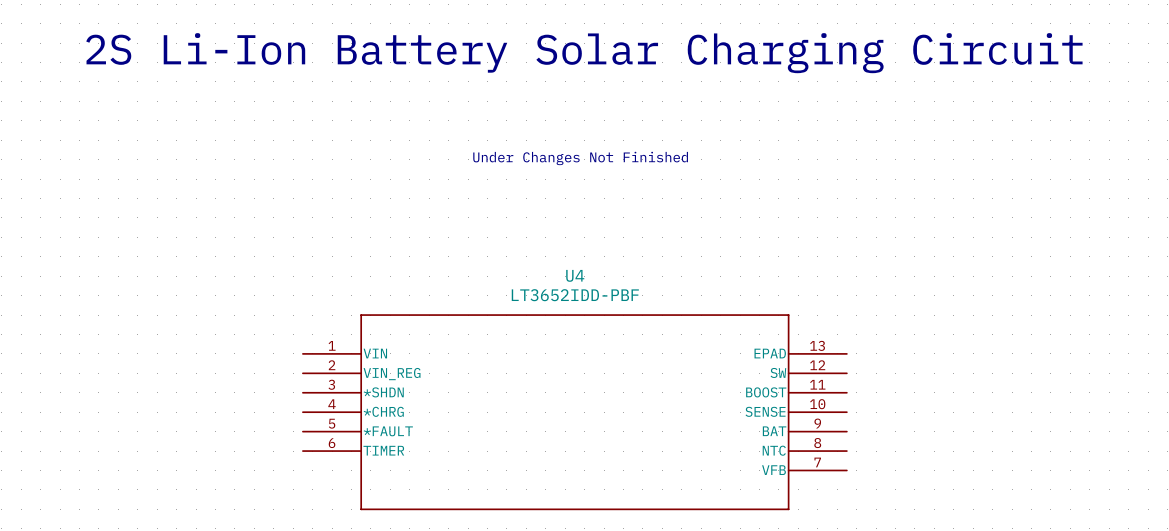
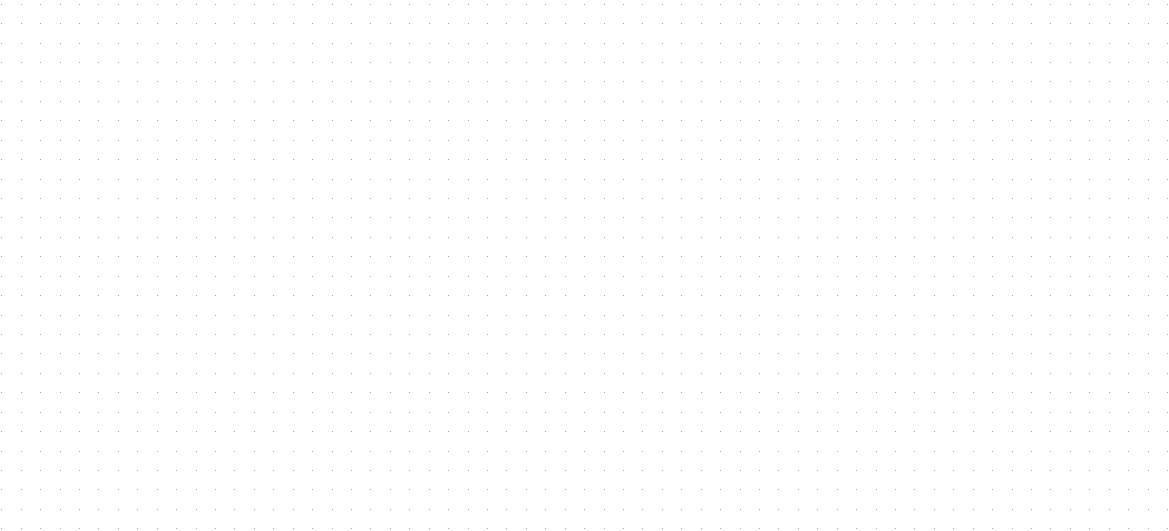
text: 2S Li-Ion Battery Solar Charging Circuit (584, 53) -> none
text: Under Changes Not Finished (580, 158) -> none
U4: LT3652IDD-PBF (574, 412) -> none

